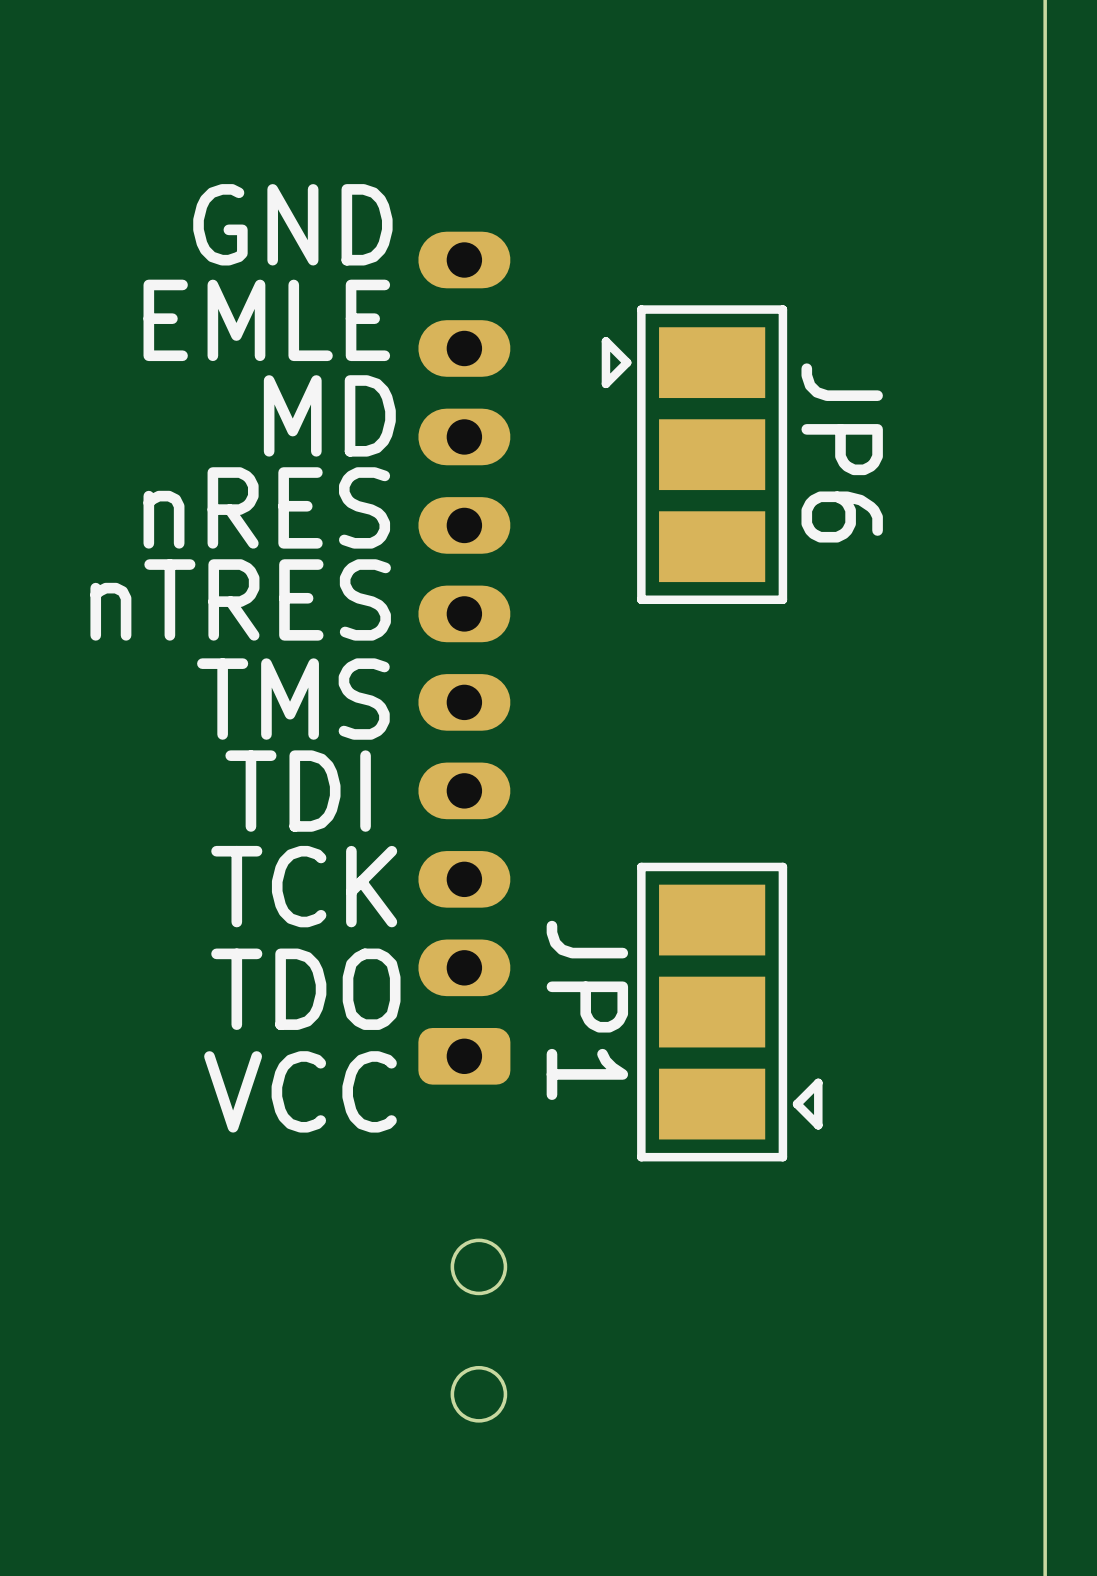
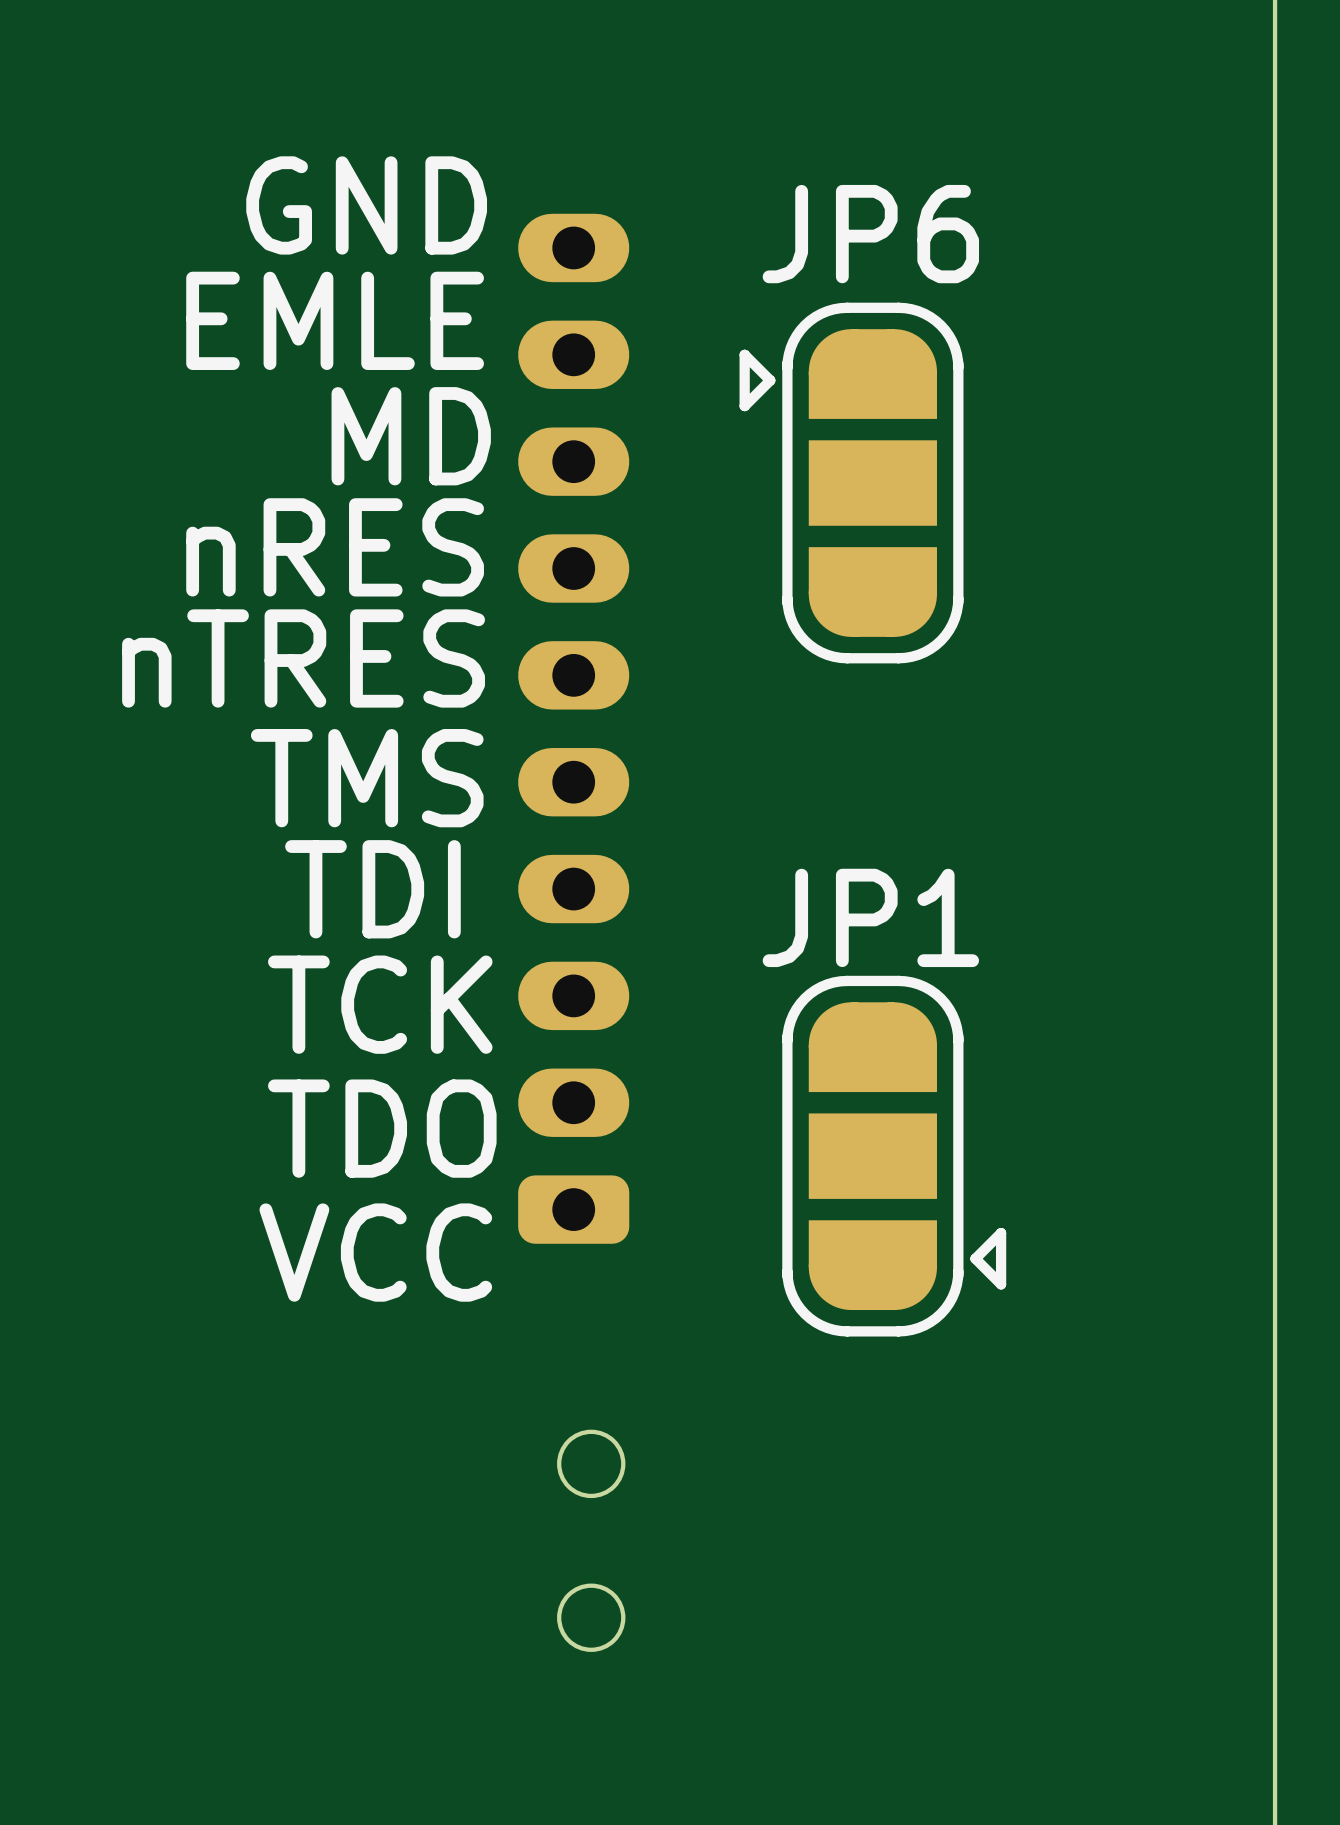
JP6 footprint: [601, 305, 788, 605] -> [739, 302, 964, 664]
JP6 name rotation: 0° (842, 452) -> 90° counterclockwise (870, 234)
JP6 name position: JP6 (842, 452) -> JP6 (870, 234)
JP1 footprint: [637, 862, 823, 1162] -> [782, 975, 1007, 1337]
JP1 name rotation: 0° (587, 1010) -> 90° counterclockwise (870, 917)

